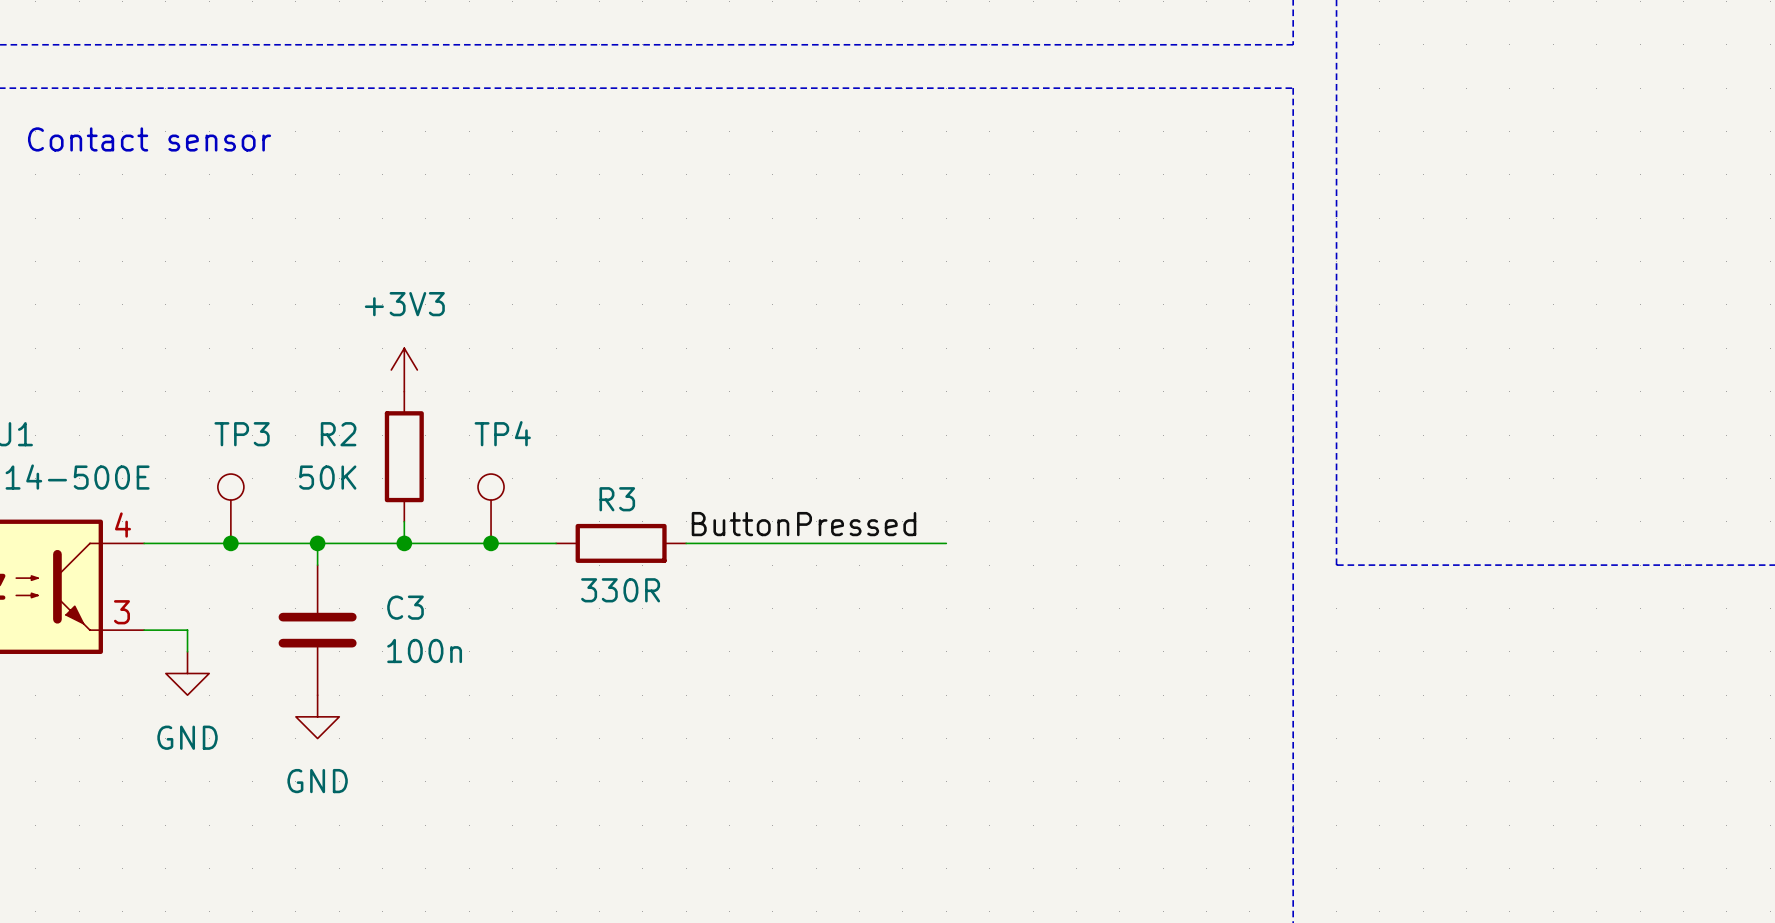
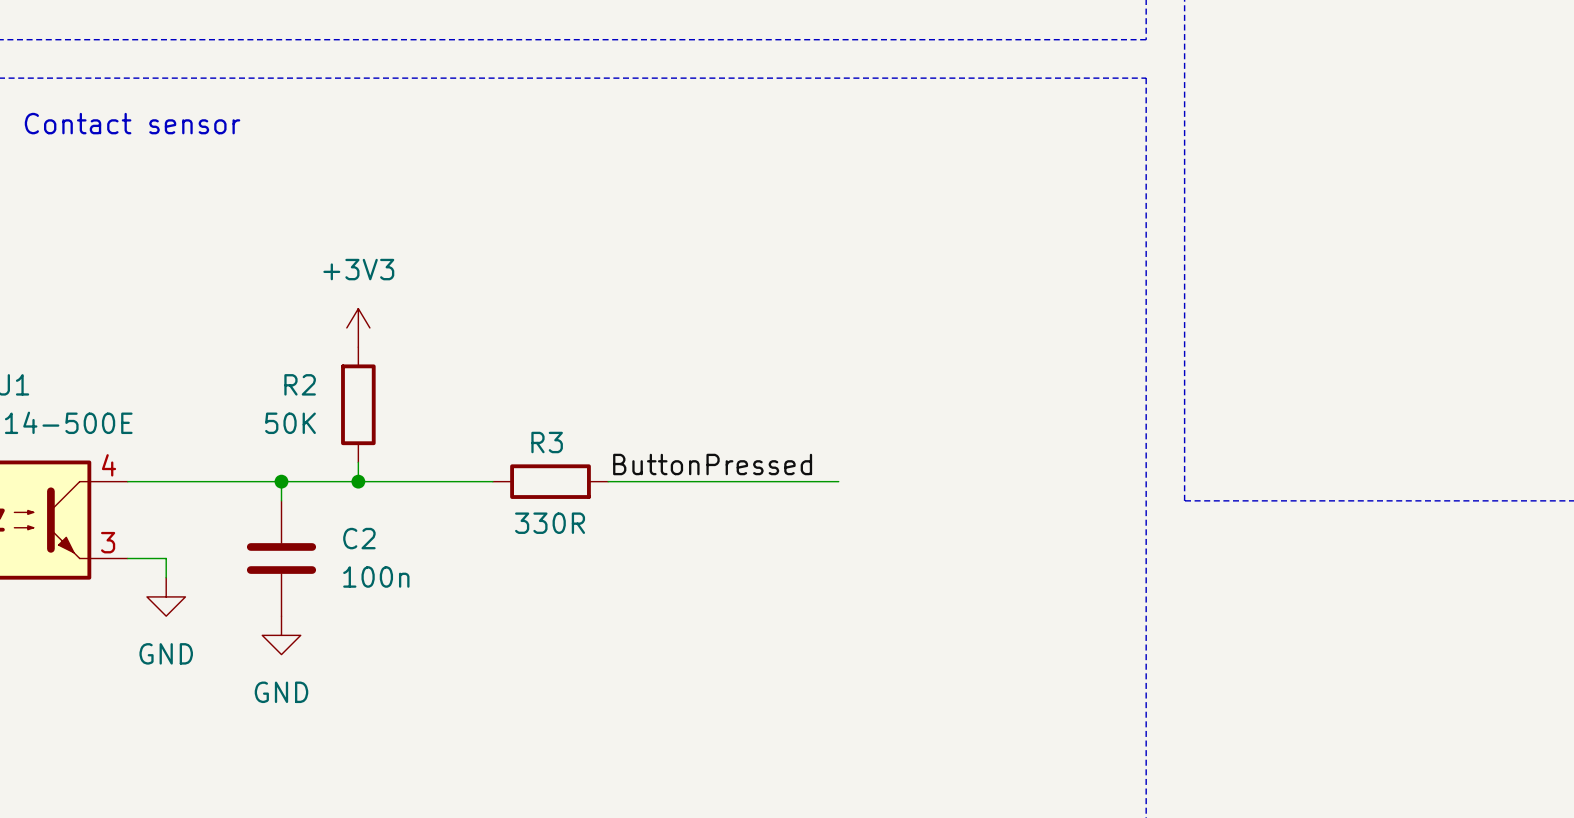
TP3: (230, 508) -> none
TP4: (491, 508) -> none
junction: (230, 543) -> none
junction: (491, 543) -> none
C3 name: C3 (405, 607) -> C2 (359, 538)

